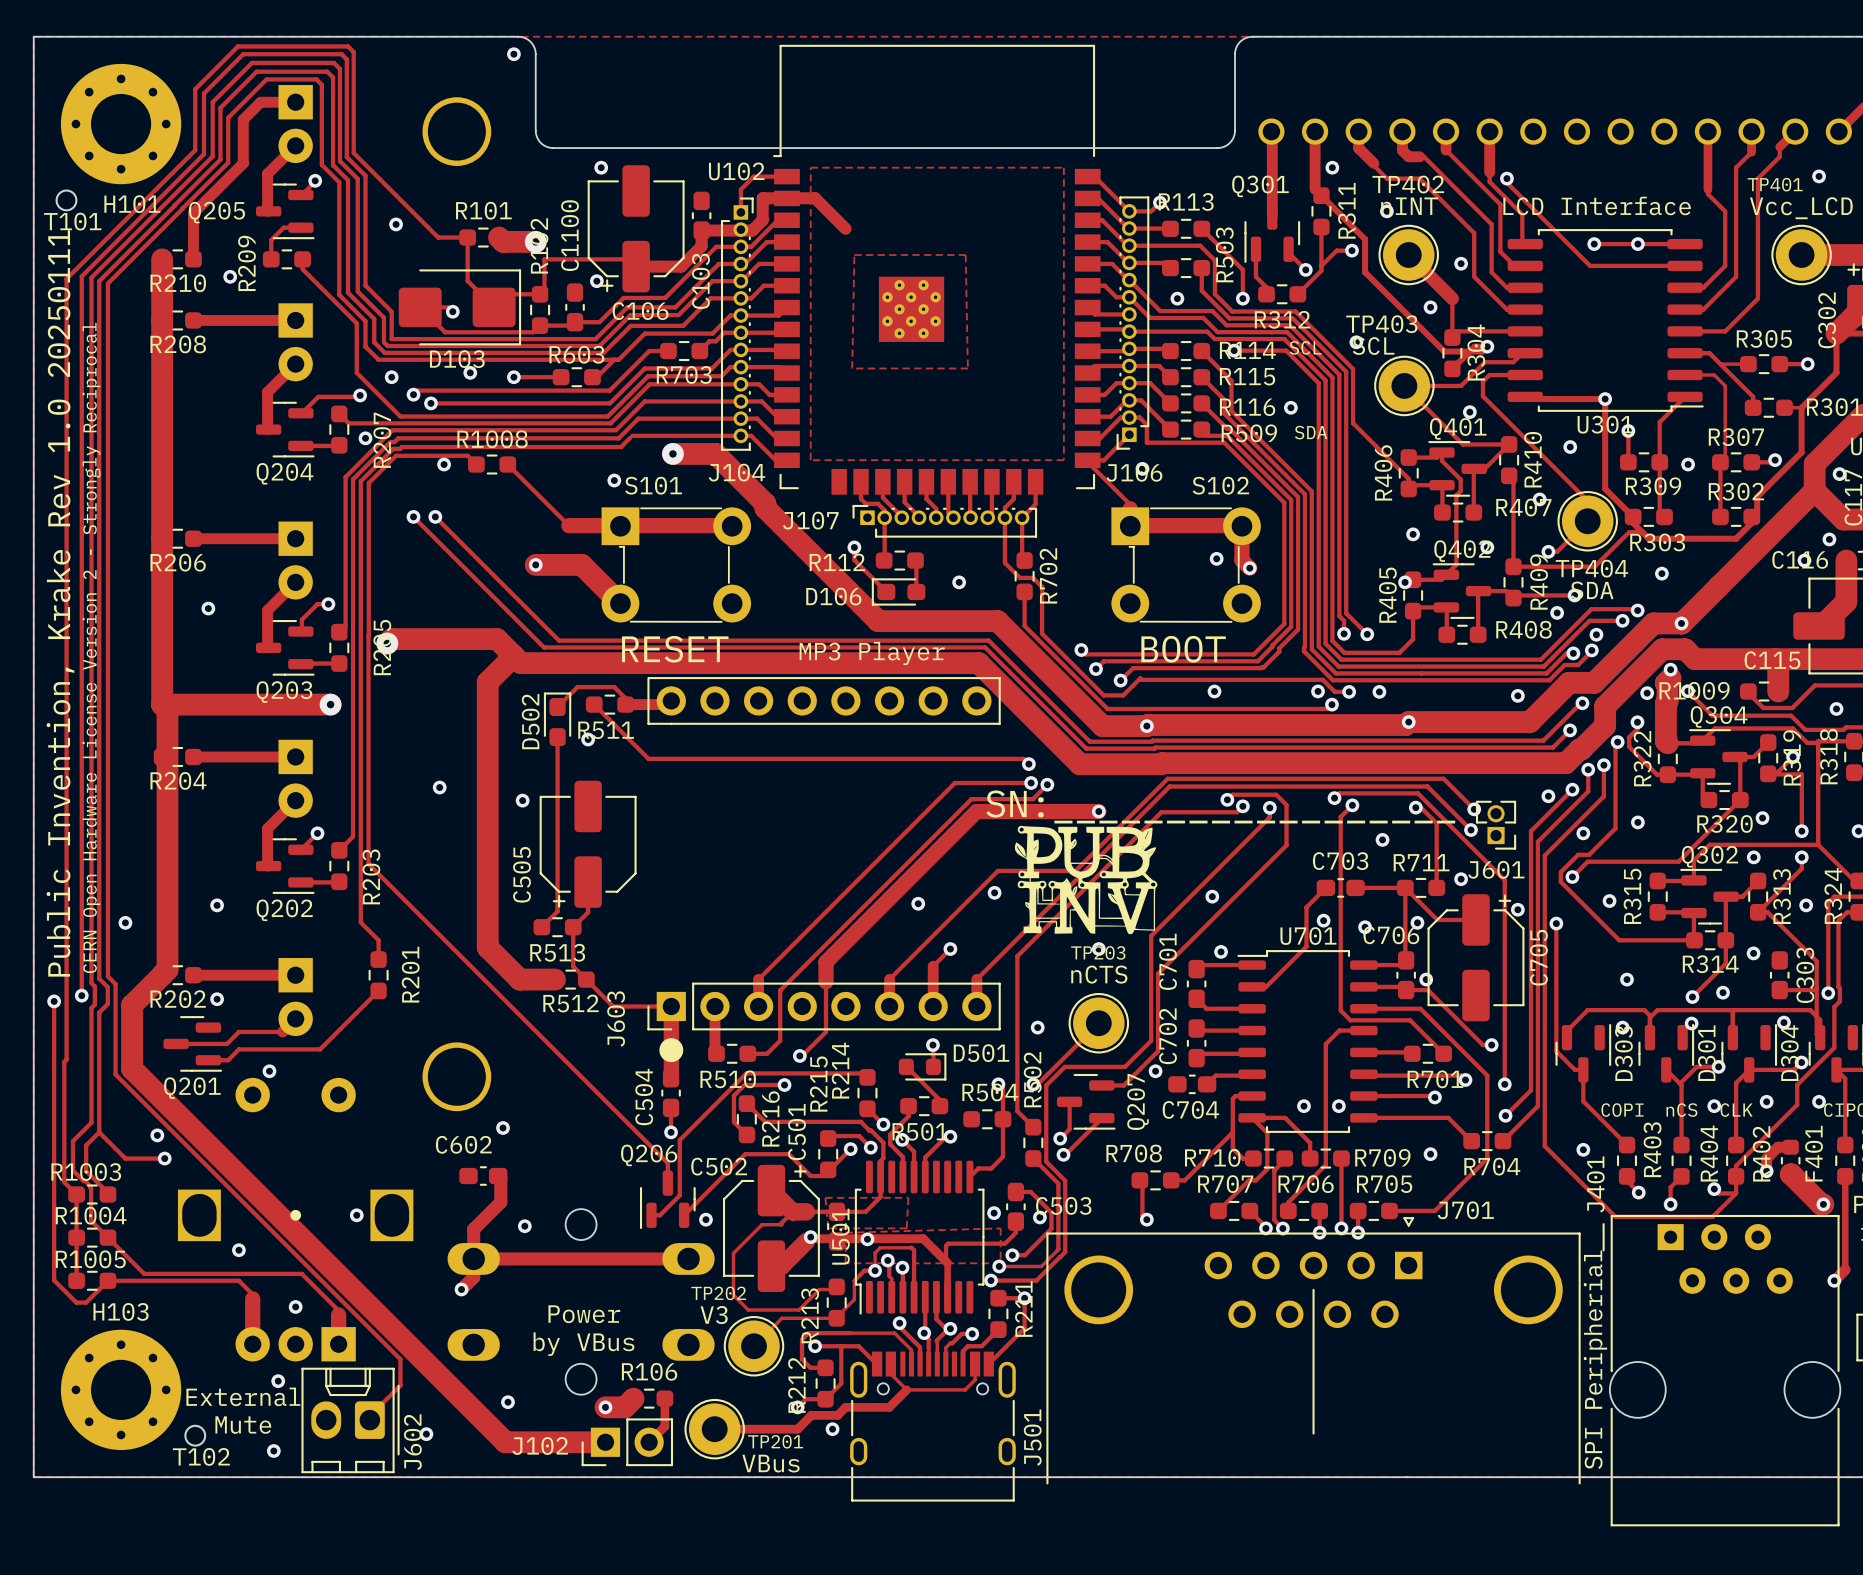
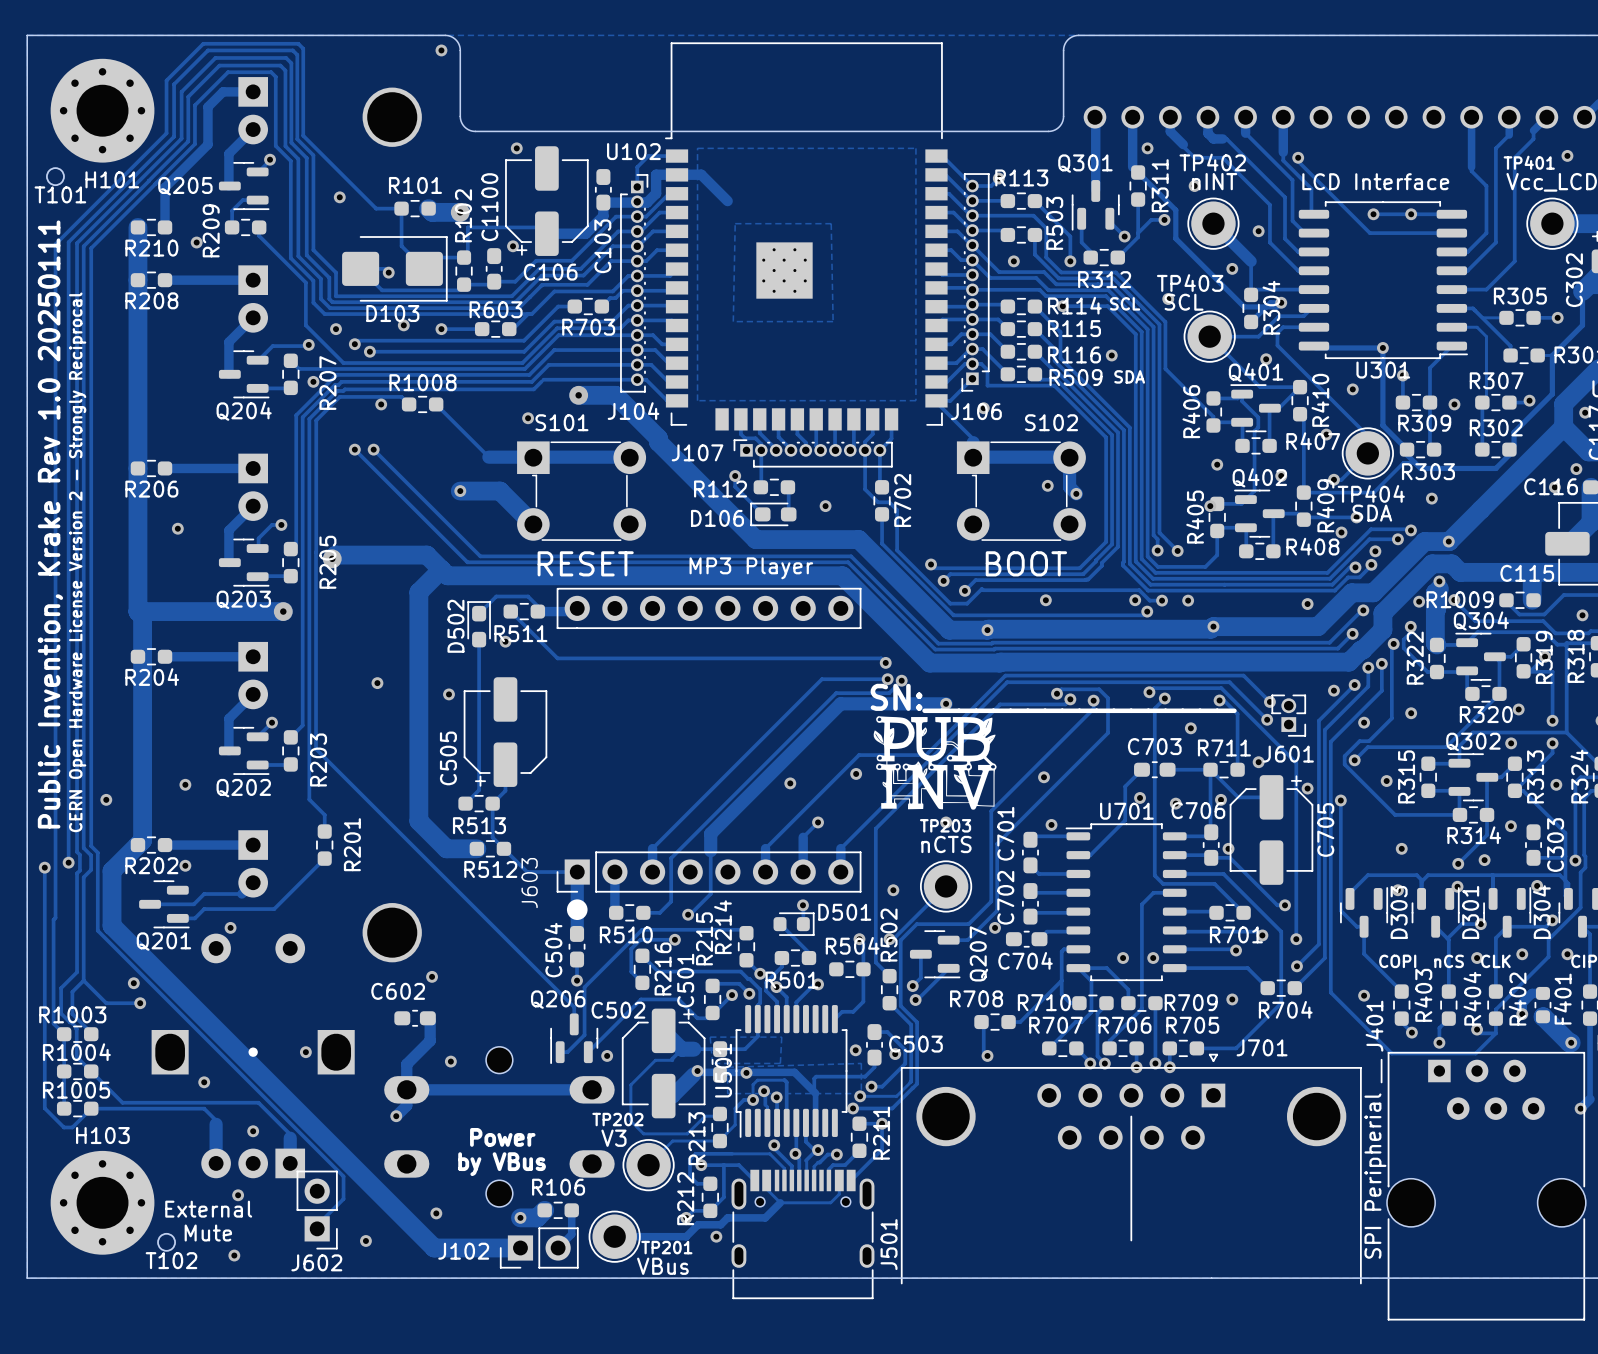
J602 footprint: [301, 1367, 400, 1474] -> [296, 1170, 338, 1250]
J602 name position: J602 (412, 1442) -> J602 (316, 1262)

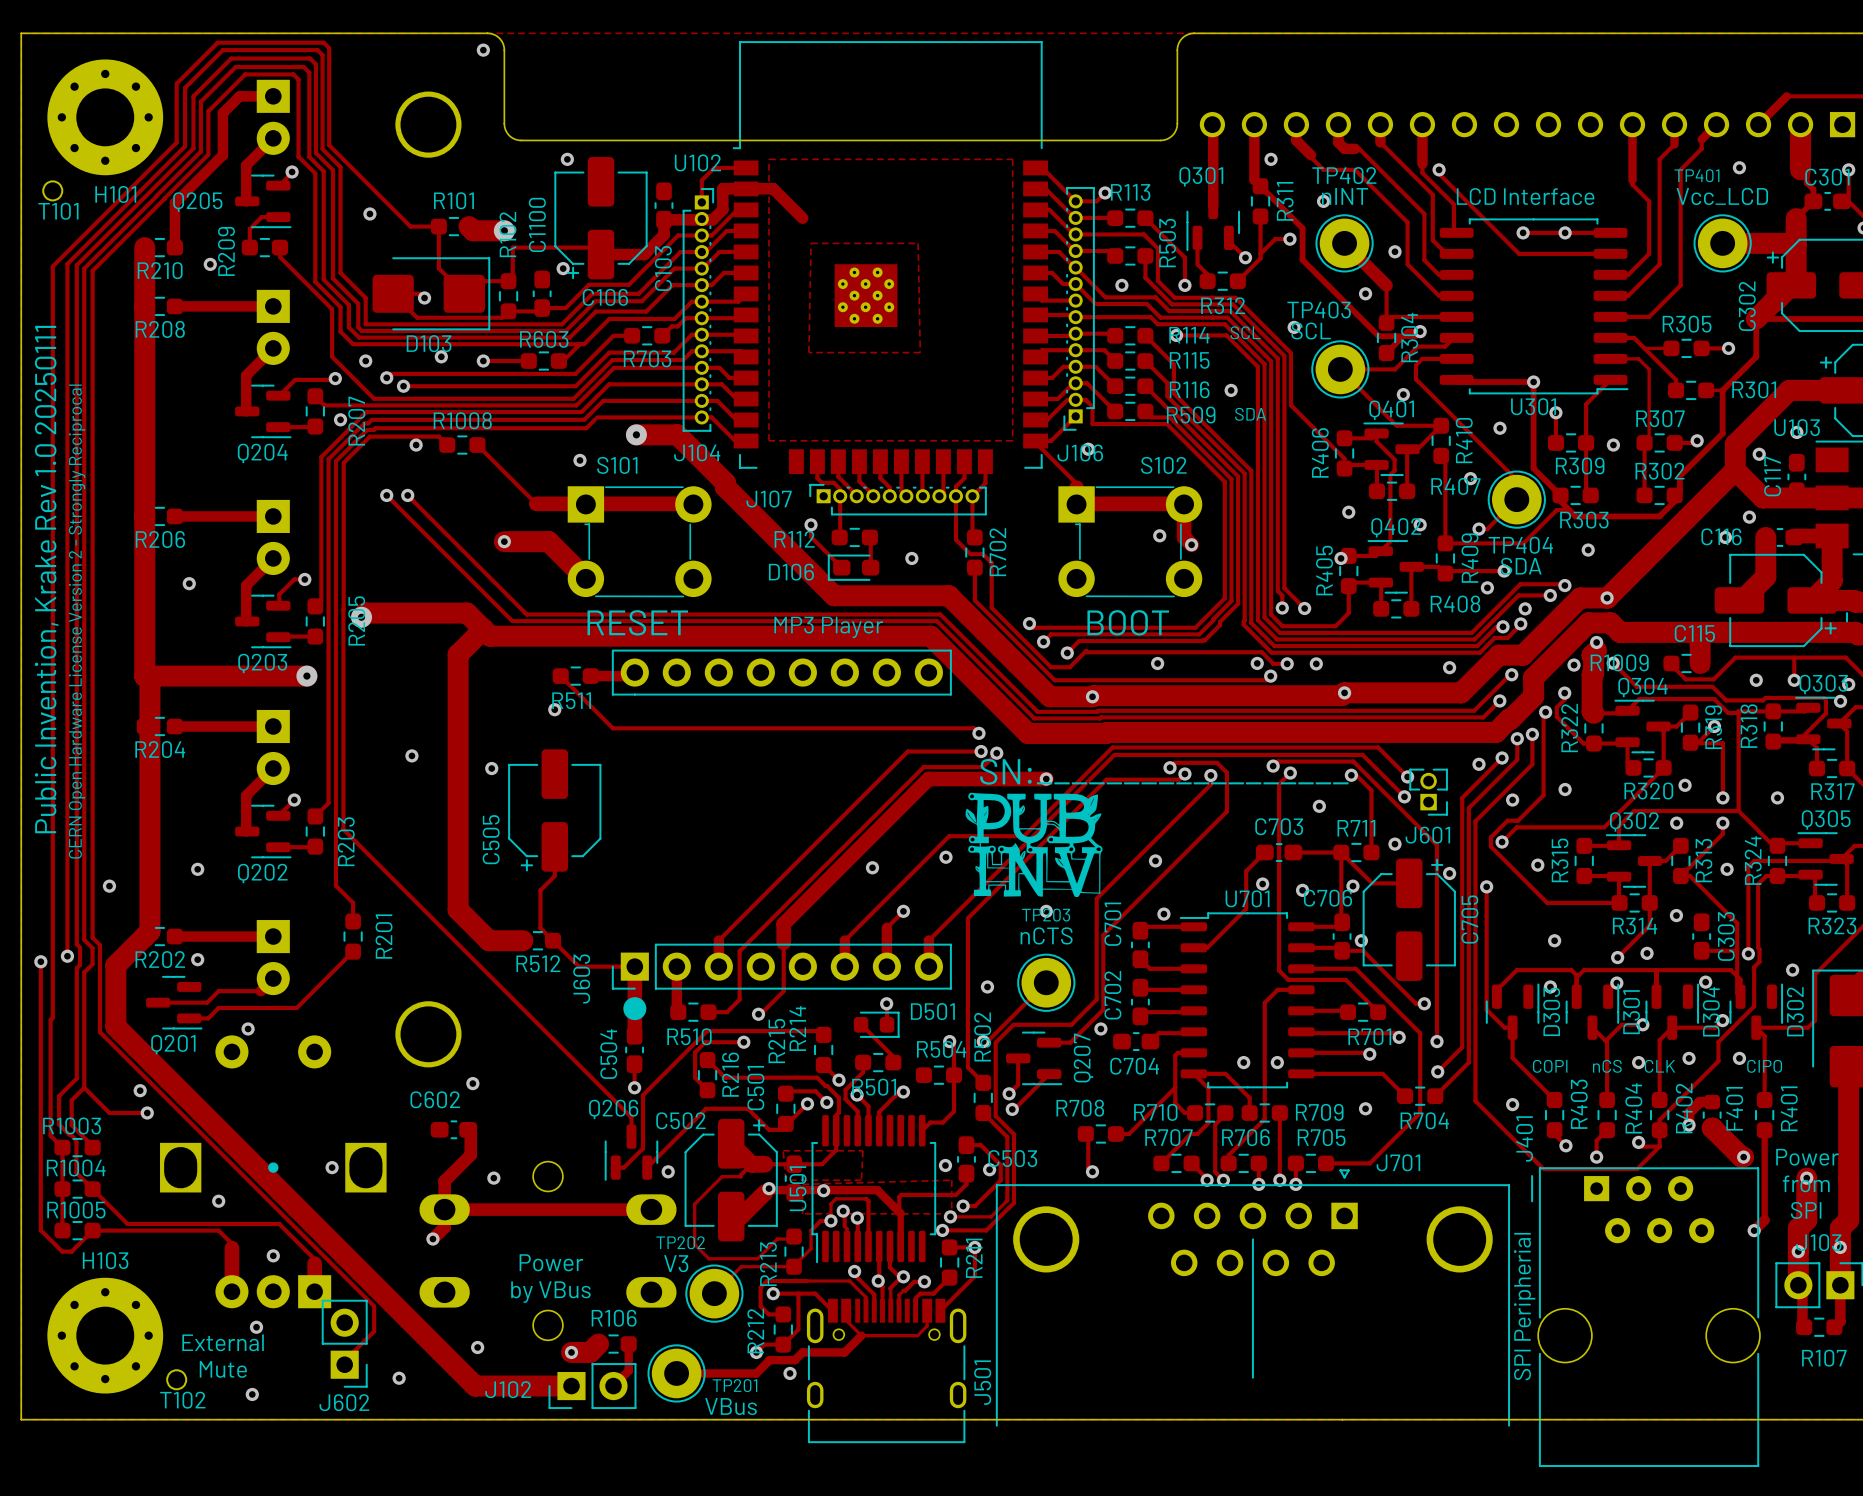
track: (537, 611) (537, 606) (528, 596) (496, 596) (479, 613) -> none
D502: (479, 624) -> none
track: (479, 639) (479, 790) (465, 803) -> none
R513: (479, 803) -> none

